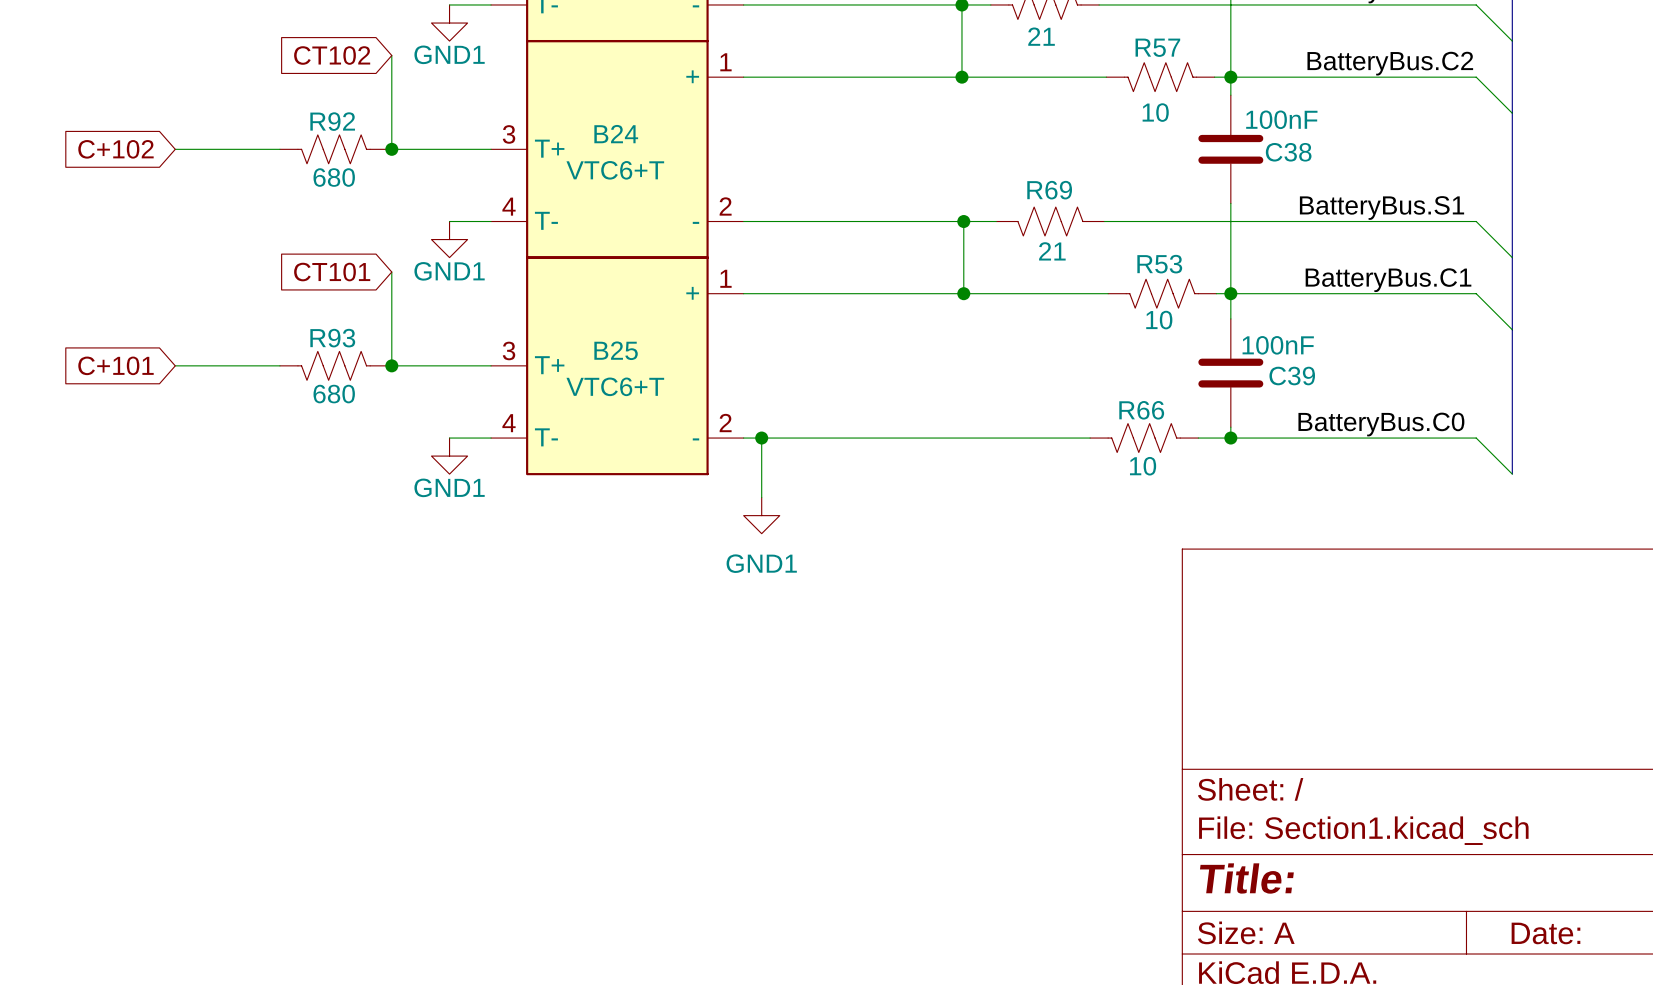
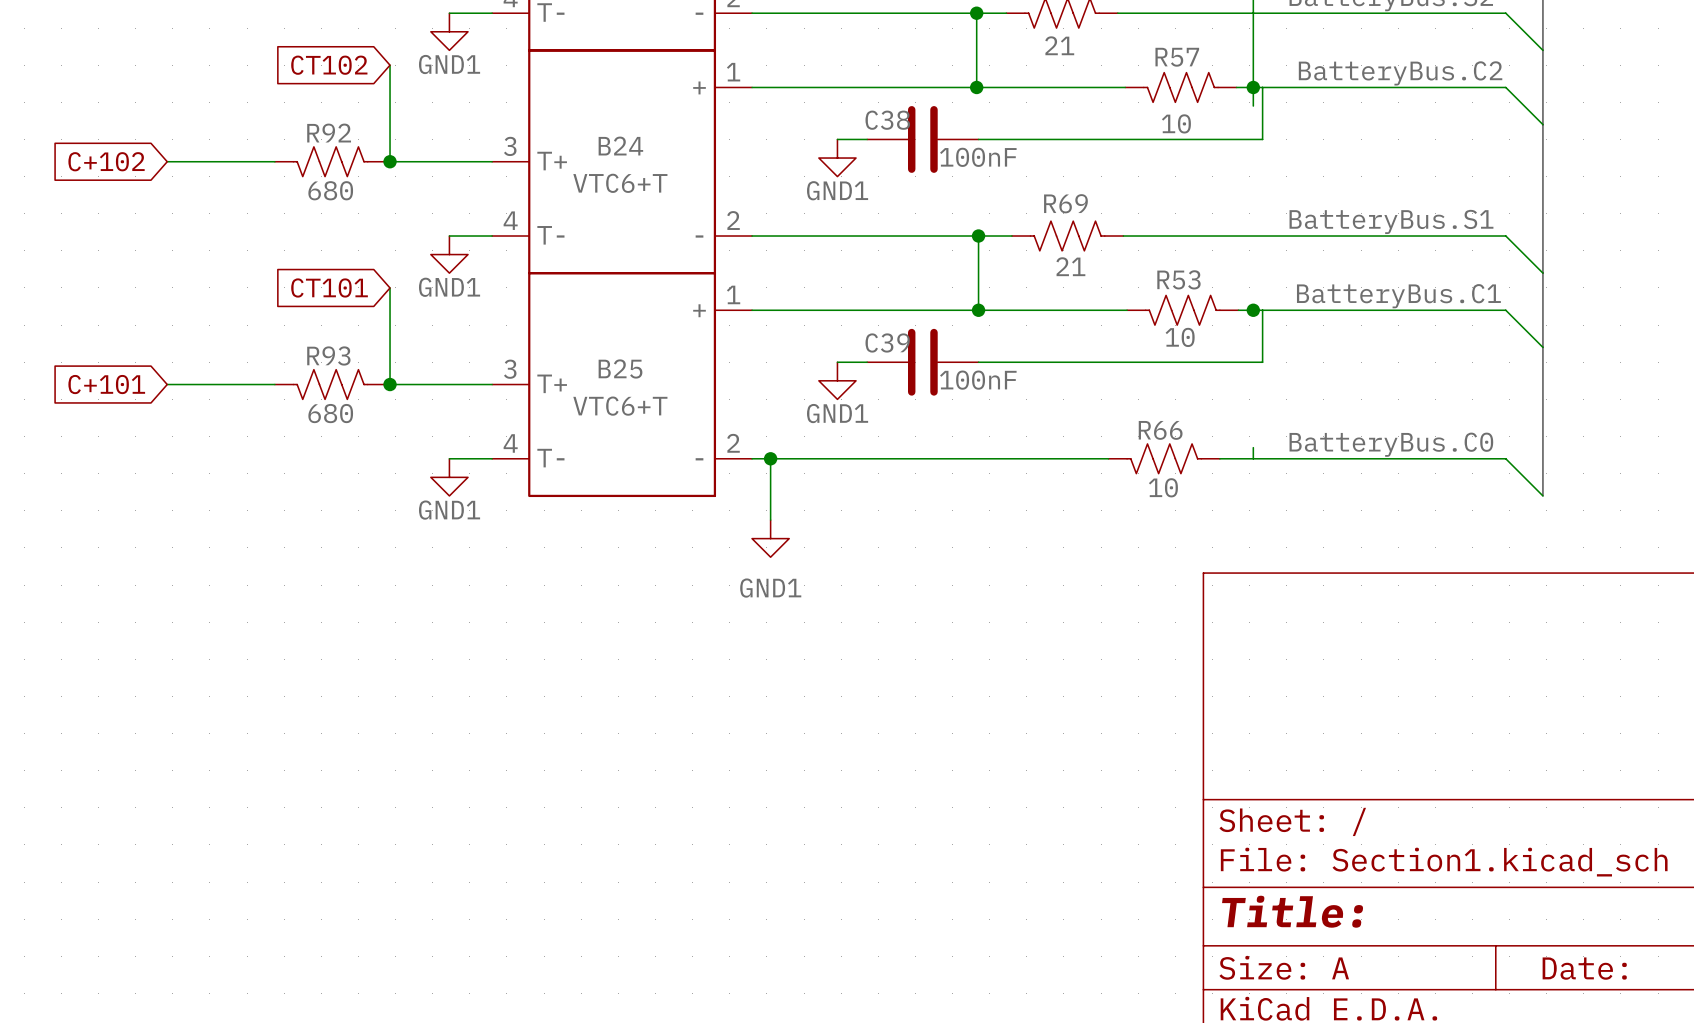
wire: none -> (1262, 87) (1262, 139) (978, 139)
C38 value position: 100nF (1281, 119) -> 100nF (978, 157)
wire: none -> (837, 139) (867, 139)
power symbol: none -> GND1 (837, 158)
C38 rotation: 0° (1230, 149) -> 90° clockwise (922, 139)
C38 position: (1230, 149) -> (922, 139)
C38 name position: C38 (1288, 152) -> C38 (887, 120)
wire: (1230, 203) (1230, 318) -> none
wire: none -> (1262, 310) (1262, 362) (978, 362)
wire: none -> (837, 362) (867, 362)
C39 value position: 100nF (1278, 345) -> 100nF (978, 380)
power symbol: none -> GND1 (837, 380)
C39 rotation: 0° (1230, 373) -> 90° clockwise (922, 362)
C39 position: (1230, 373) -> (922, 362)
C39 name position: C39 (1292, 376) -> C39 (887, 342)
junction: (1230, 438) -> none

